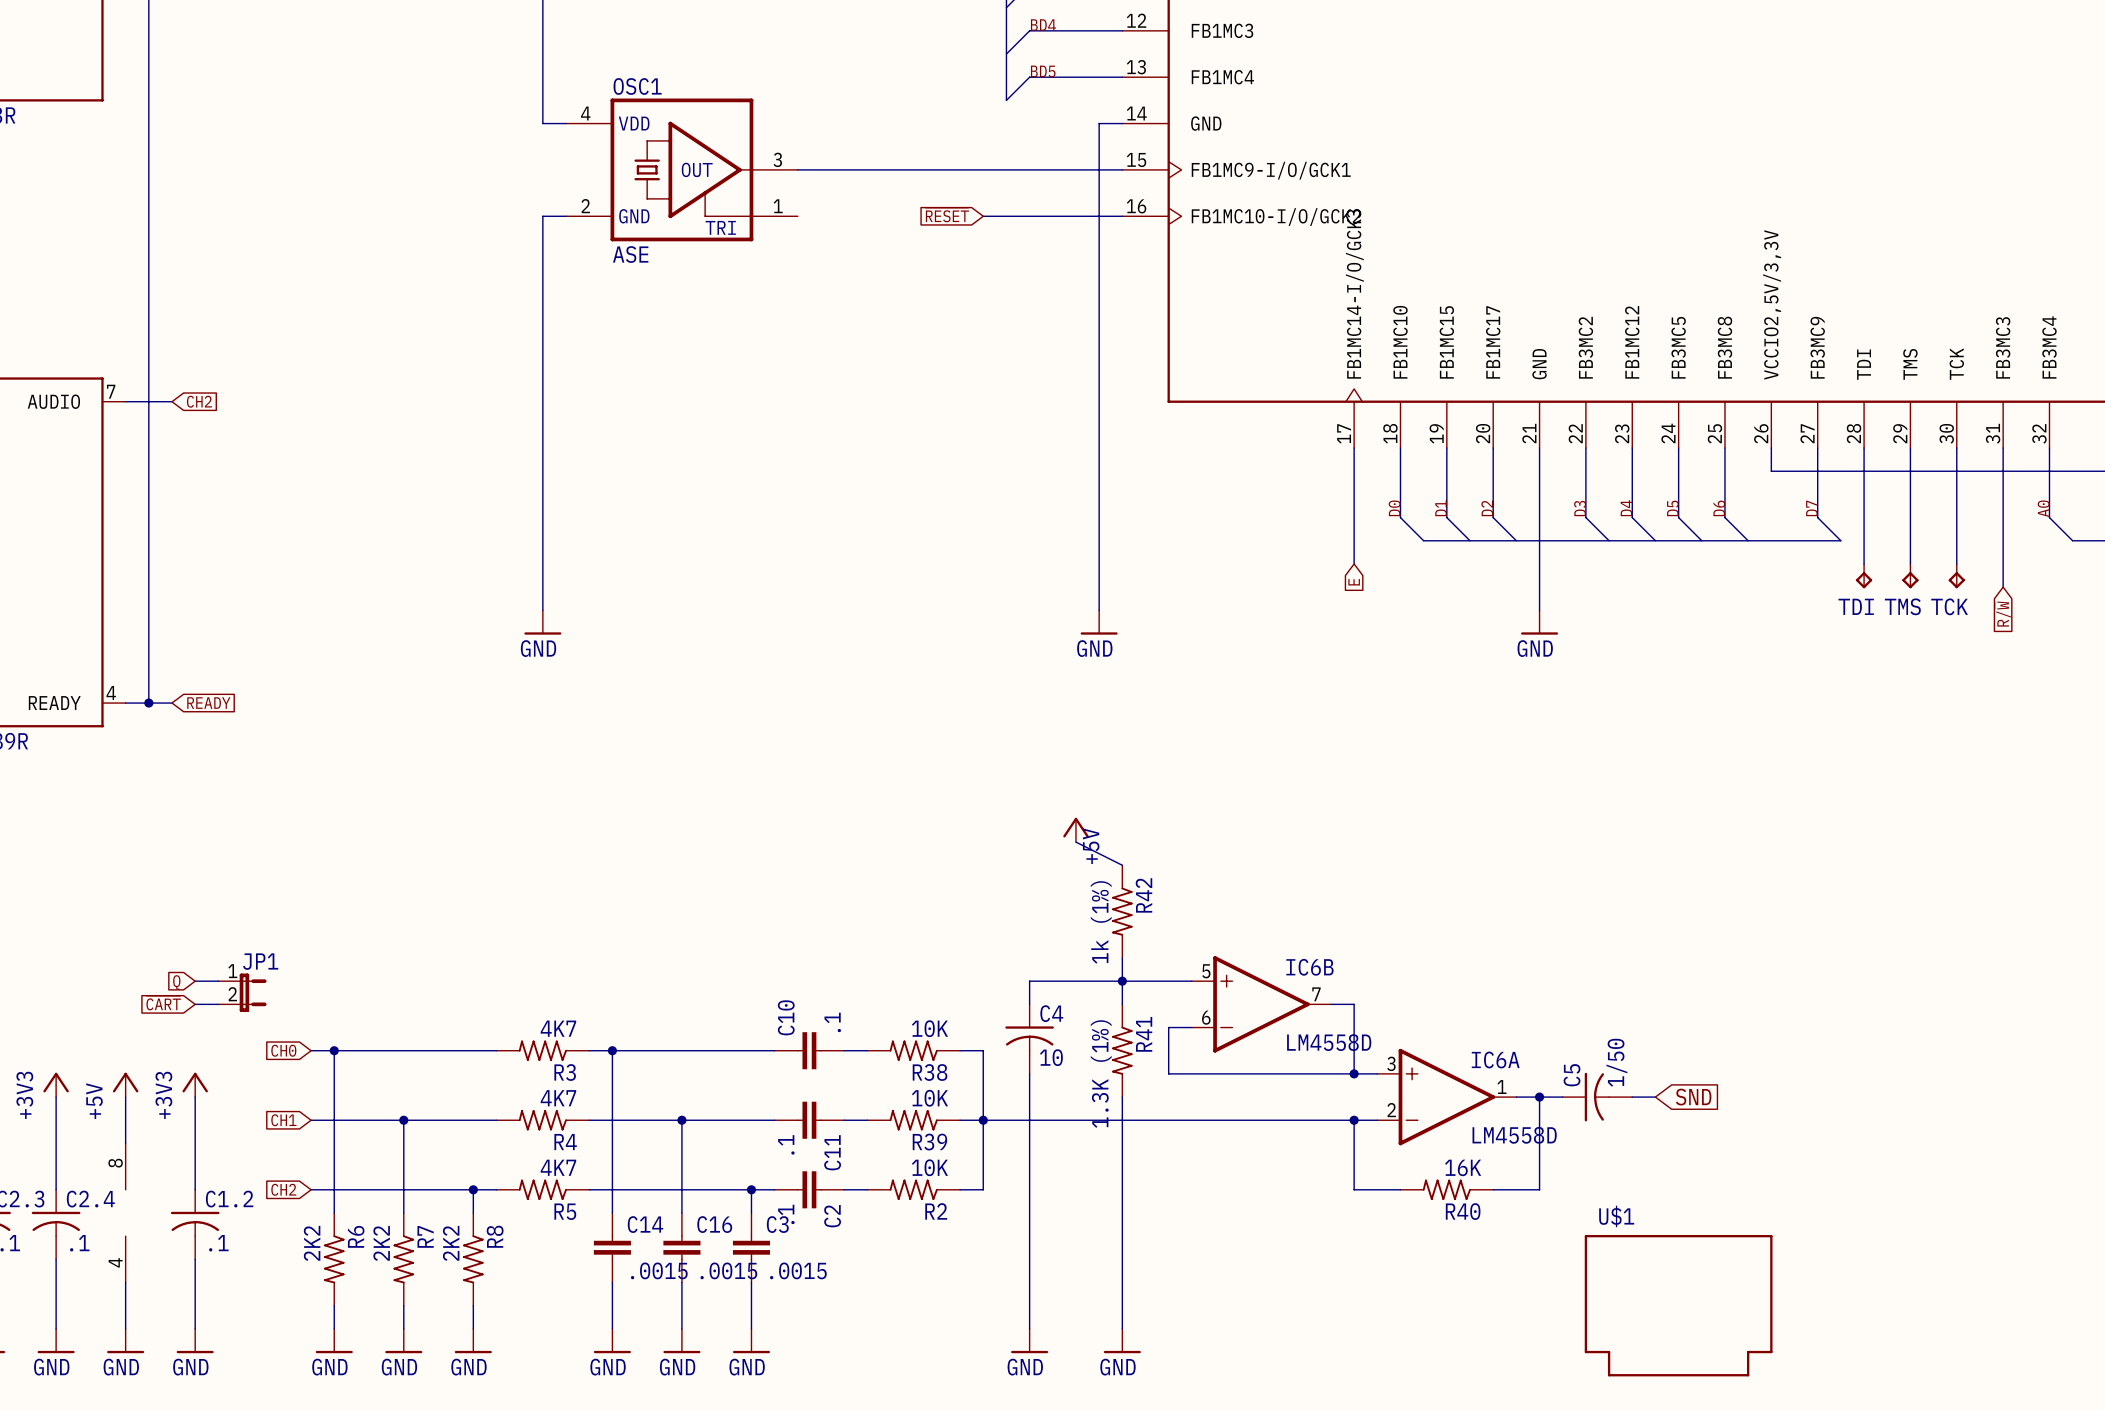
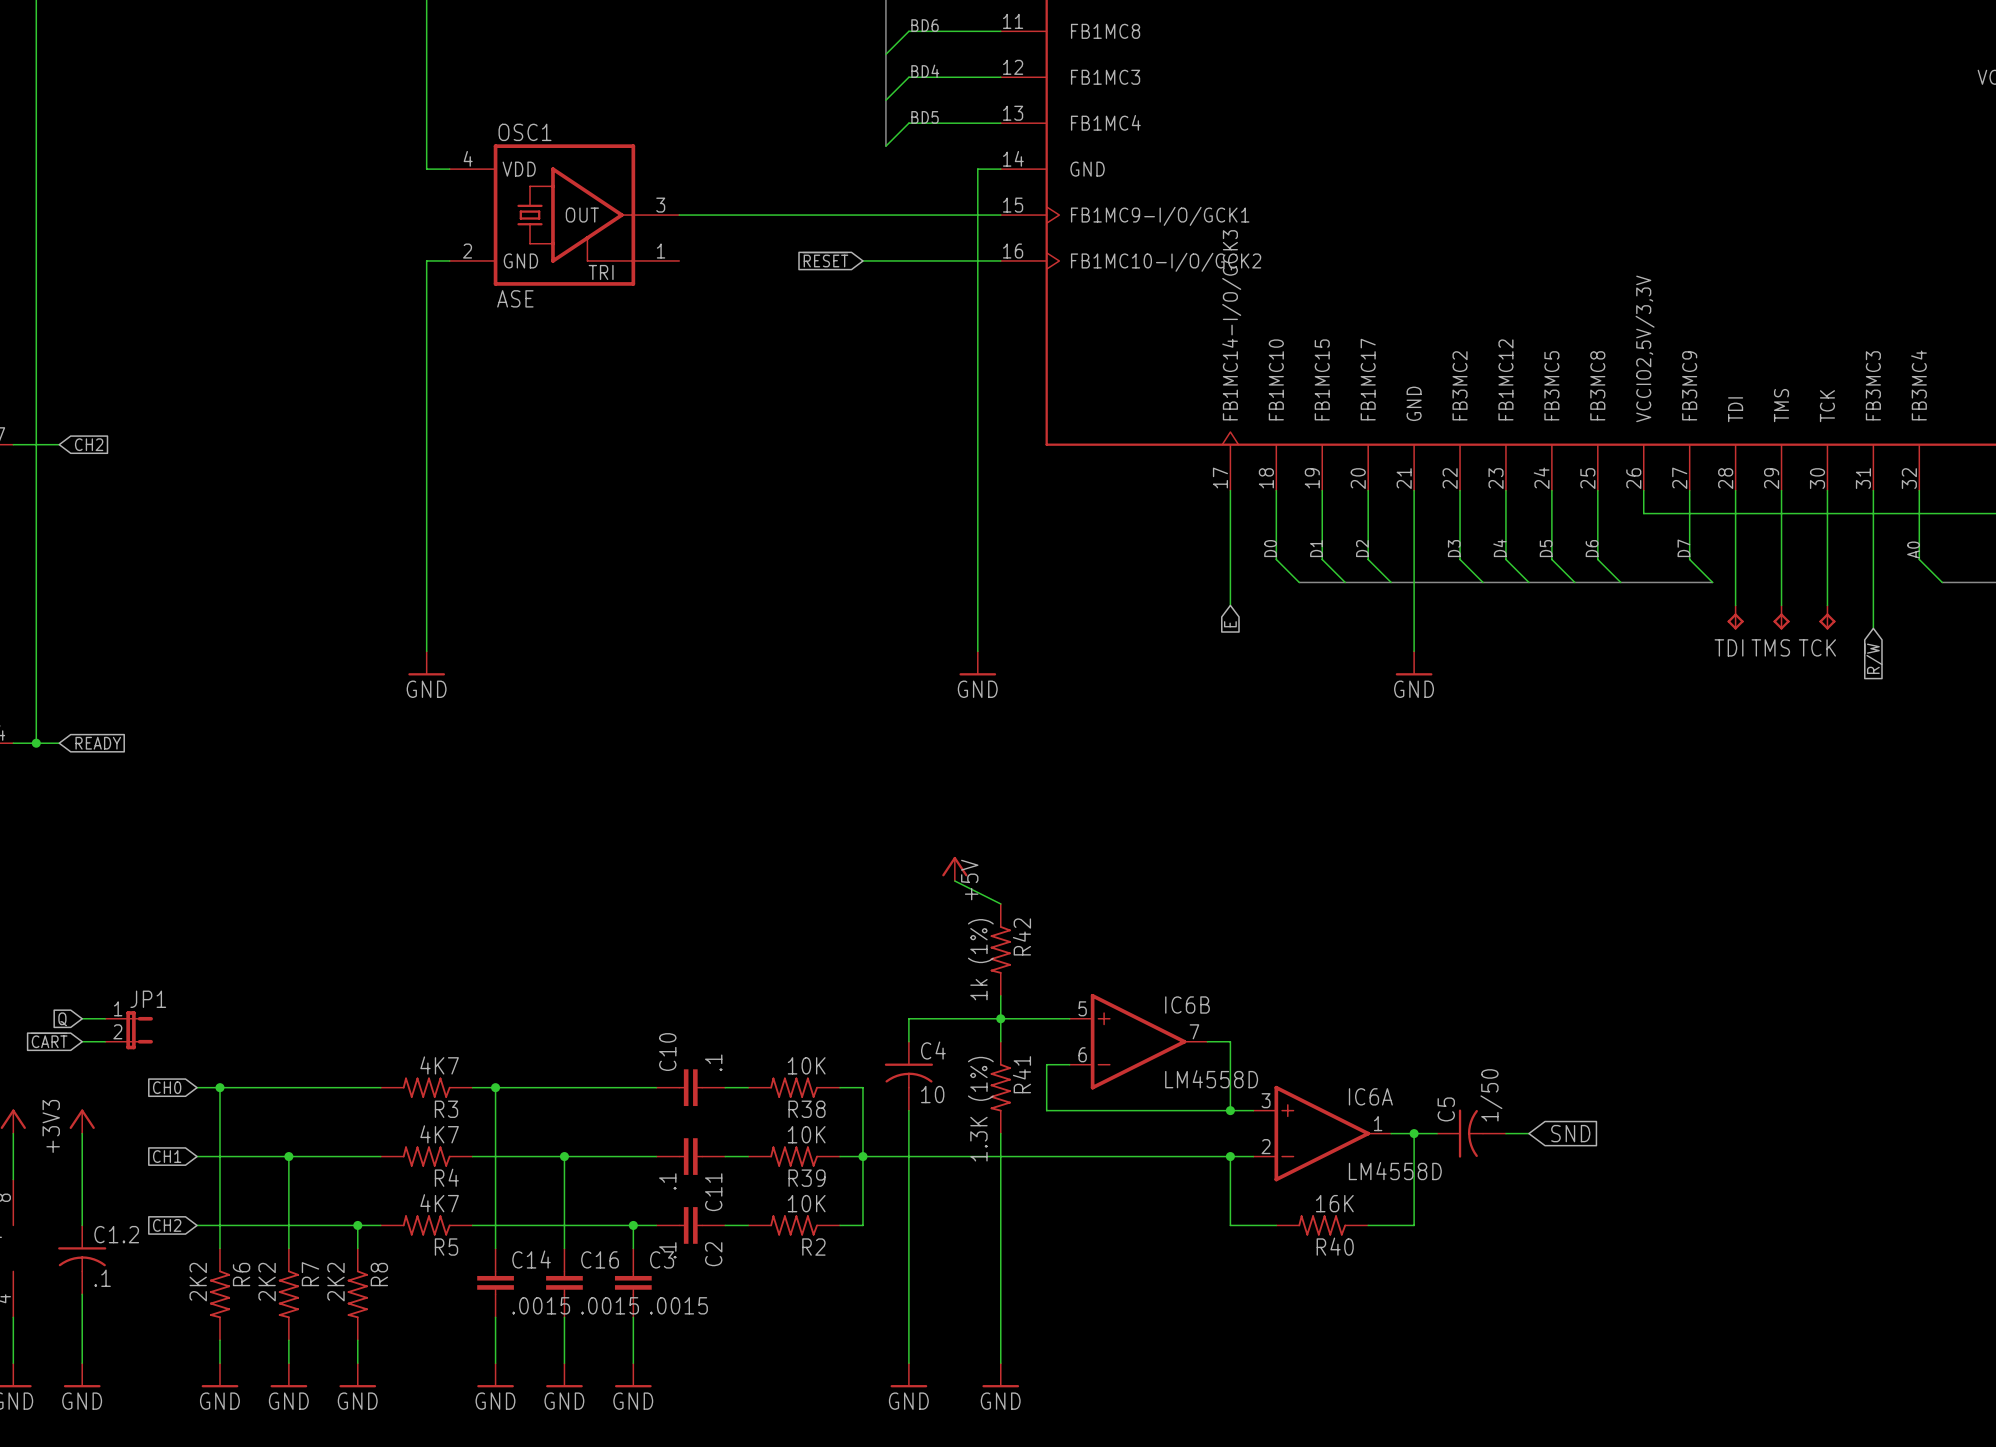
U$1: (1678, 1305) -> none

